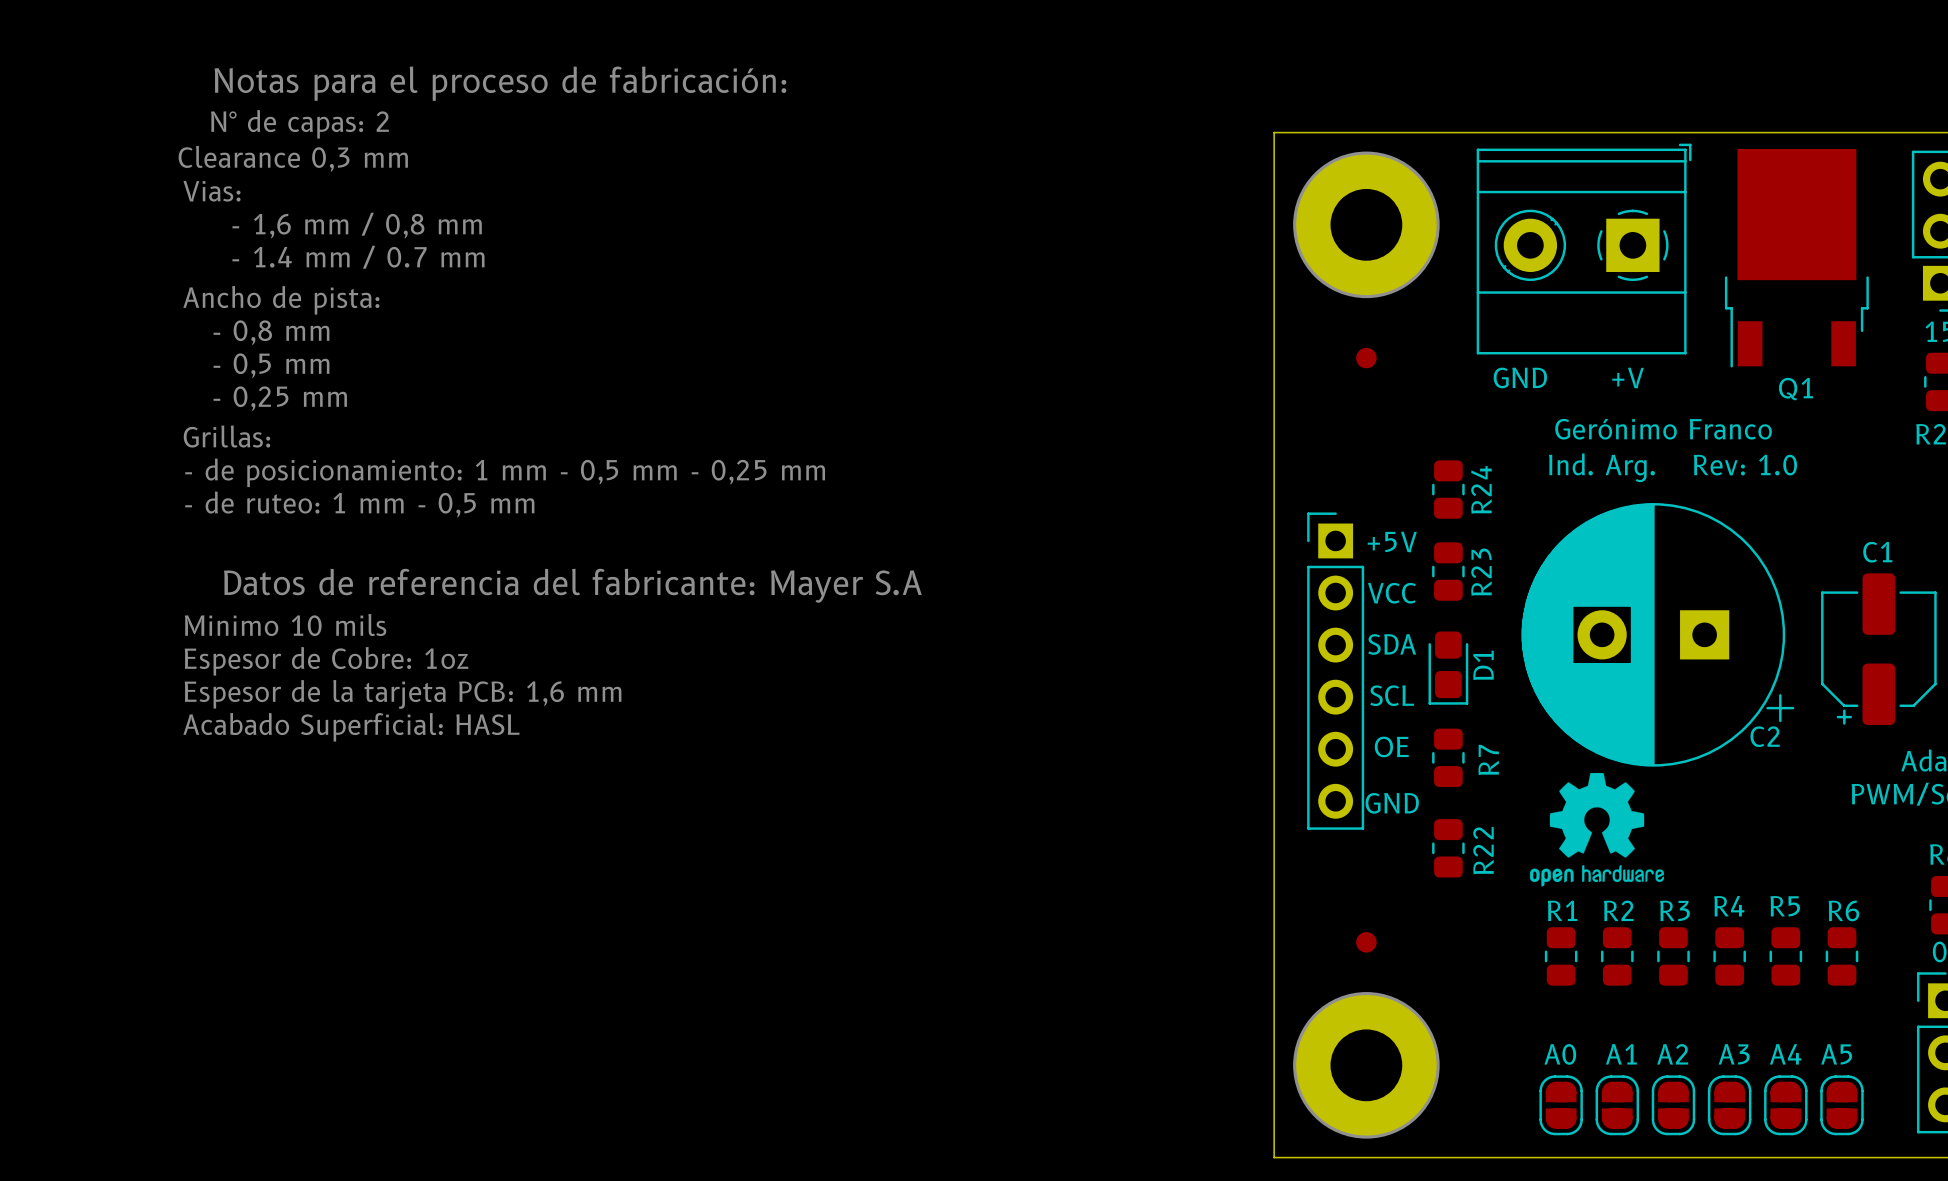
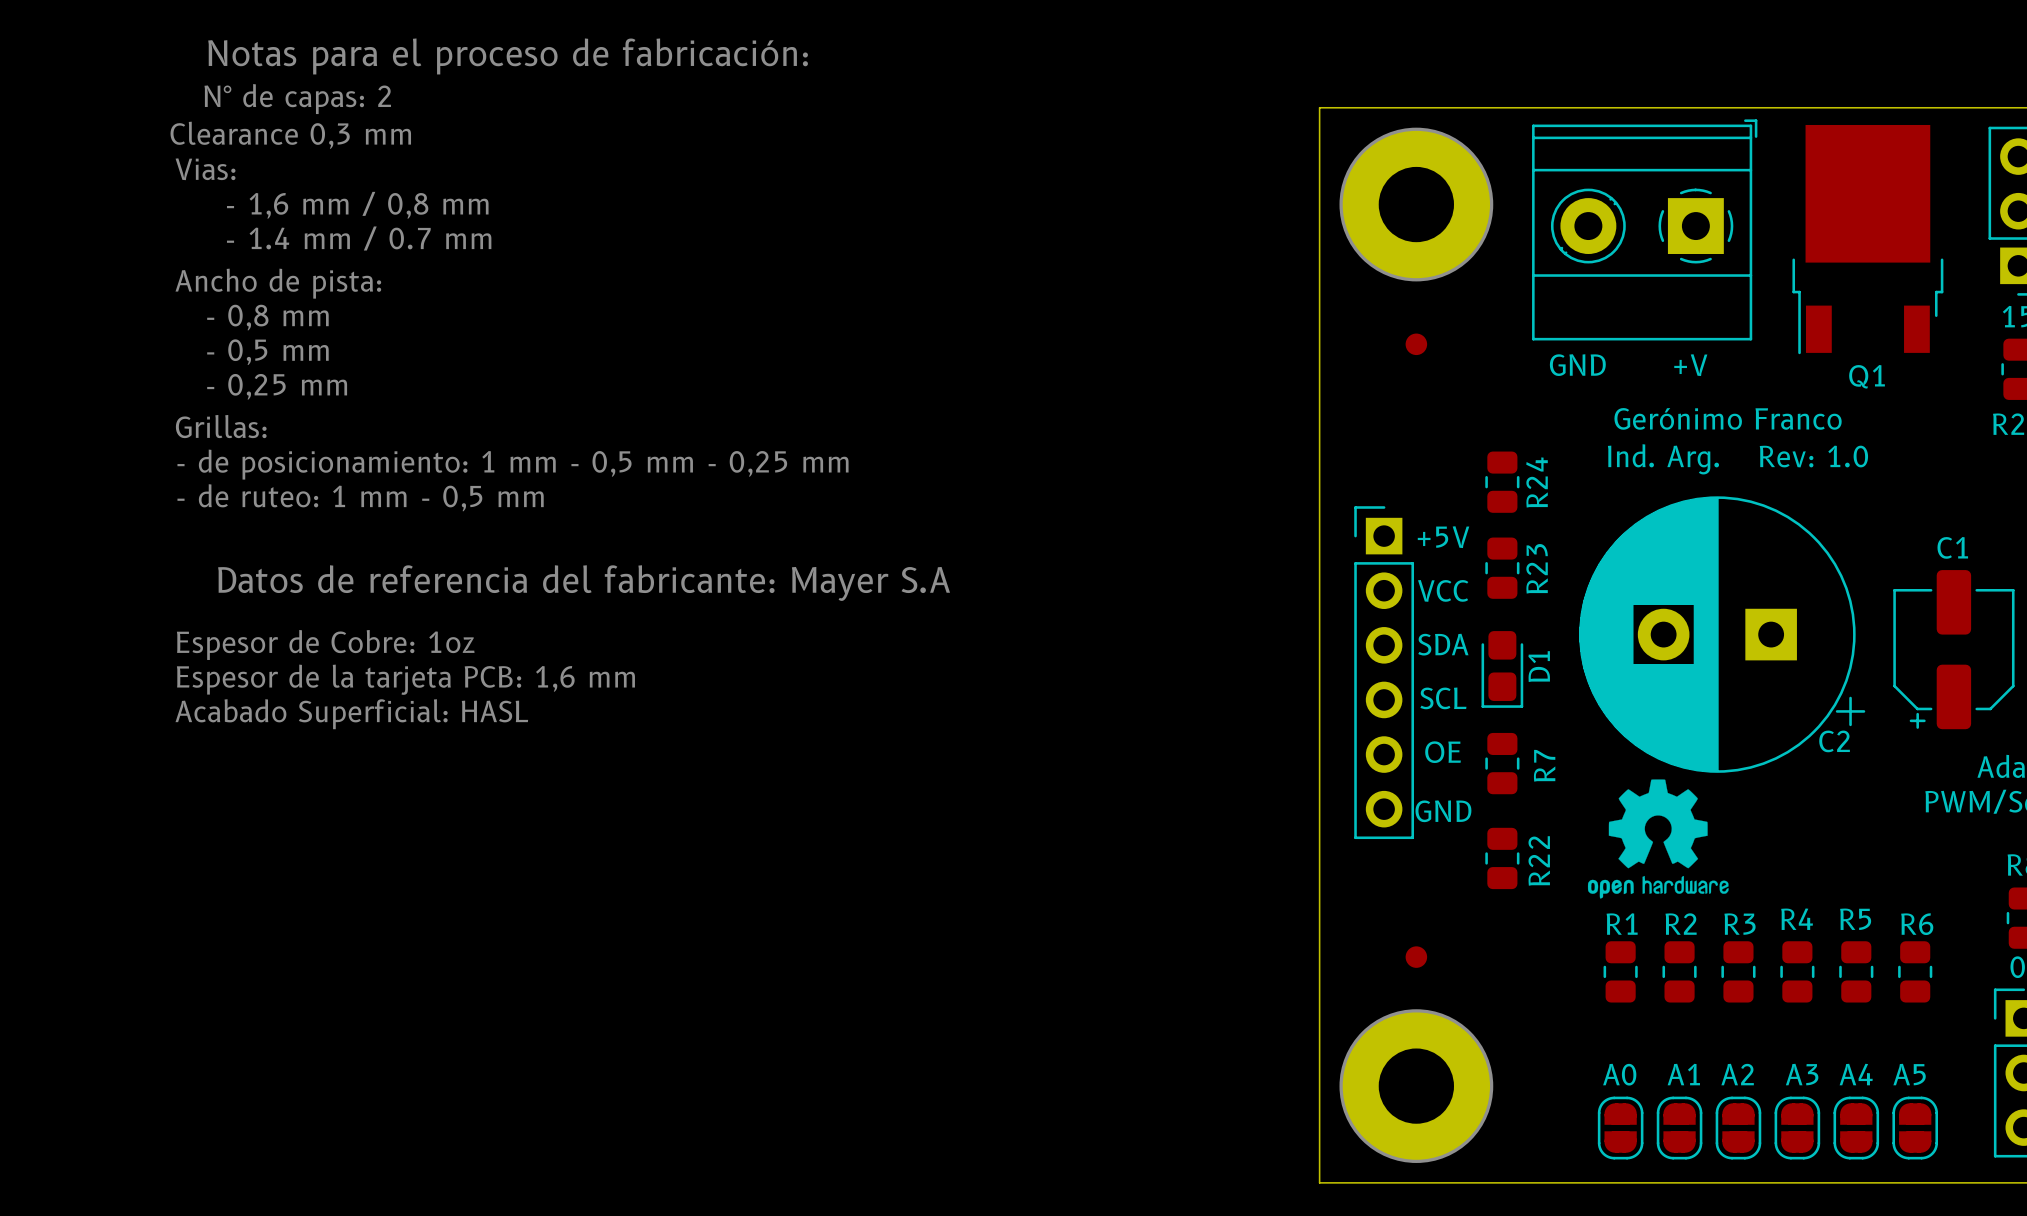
text: Minimo 10 mils (285, 625) -> none
text position: Espesor de Cobre: 1oz (326, 661) -> Espesor de Cobre: 1oz (325, 644)
text position: Espesor de la tarjeta PCB: 1,6 mm (403, 694) -> Espesor de la tarjeta PCB: 1,6 mm (405, 679)
text position: Acabado Superficial: HASL (351, 727) -> Acabado Superficial: HASL (351, 714)

